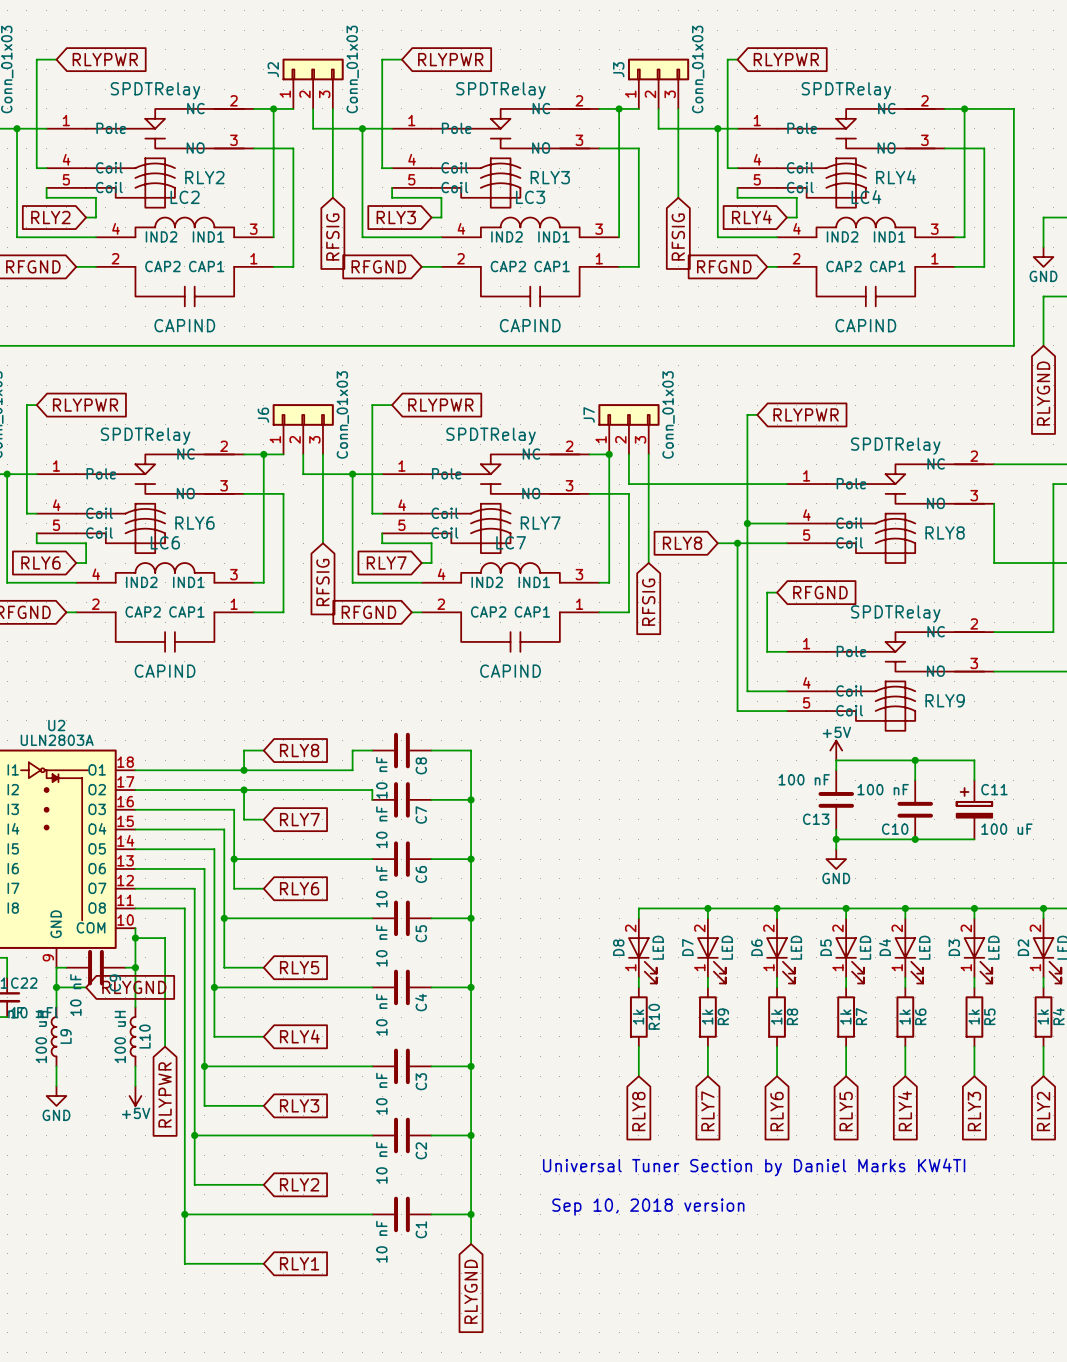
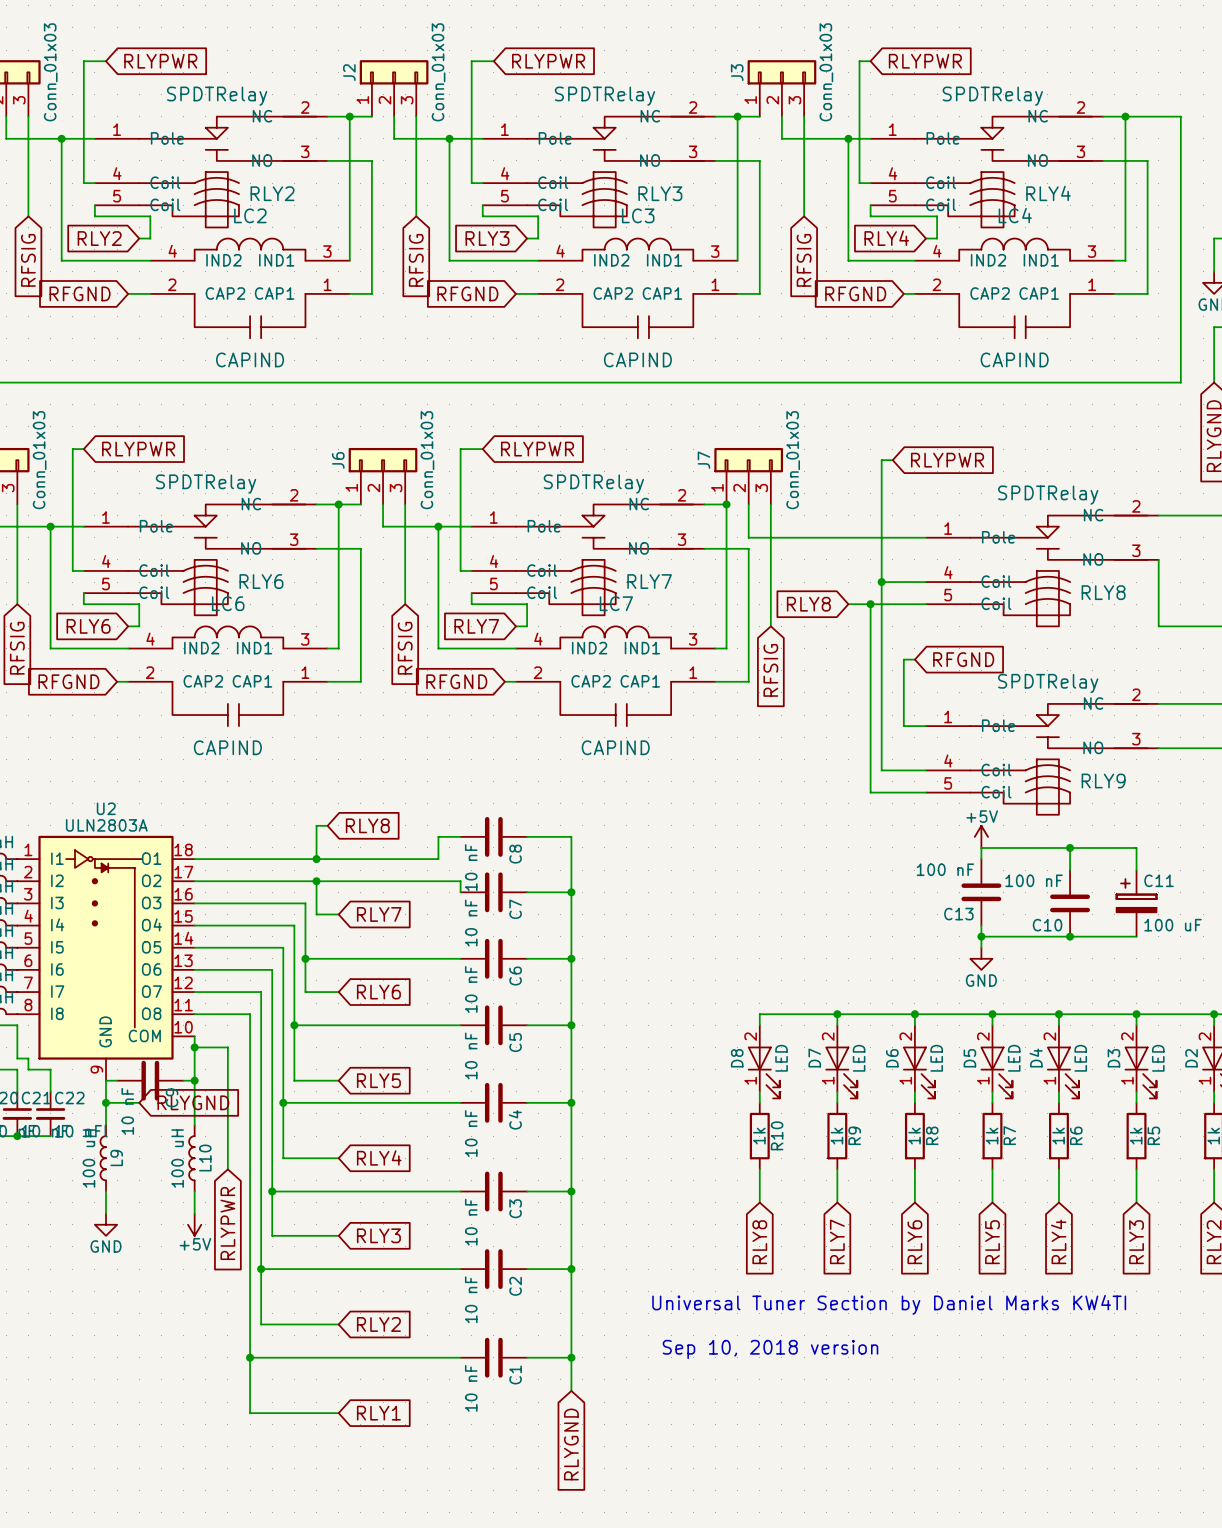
wire: (244, 750) (263, 750) -> (316, 836) (316, 825) (327, 825)
global label position: RLY8 (299, 750) -> RLY8 (367, 825)

